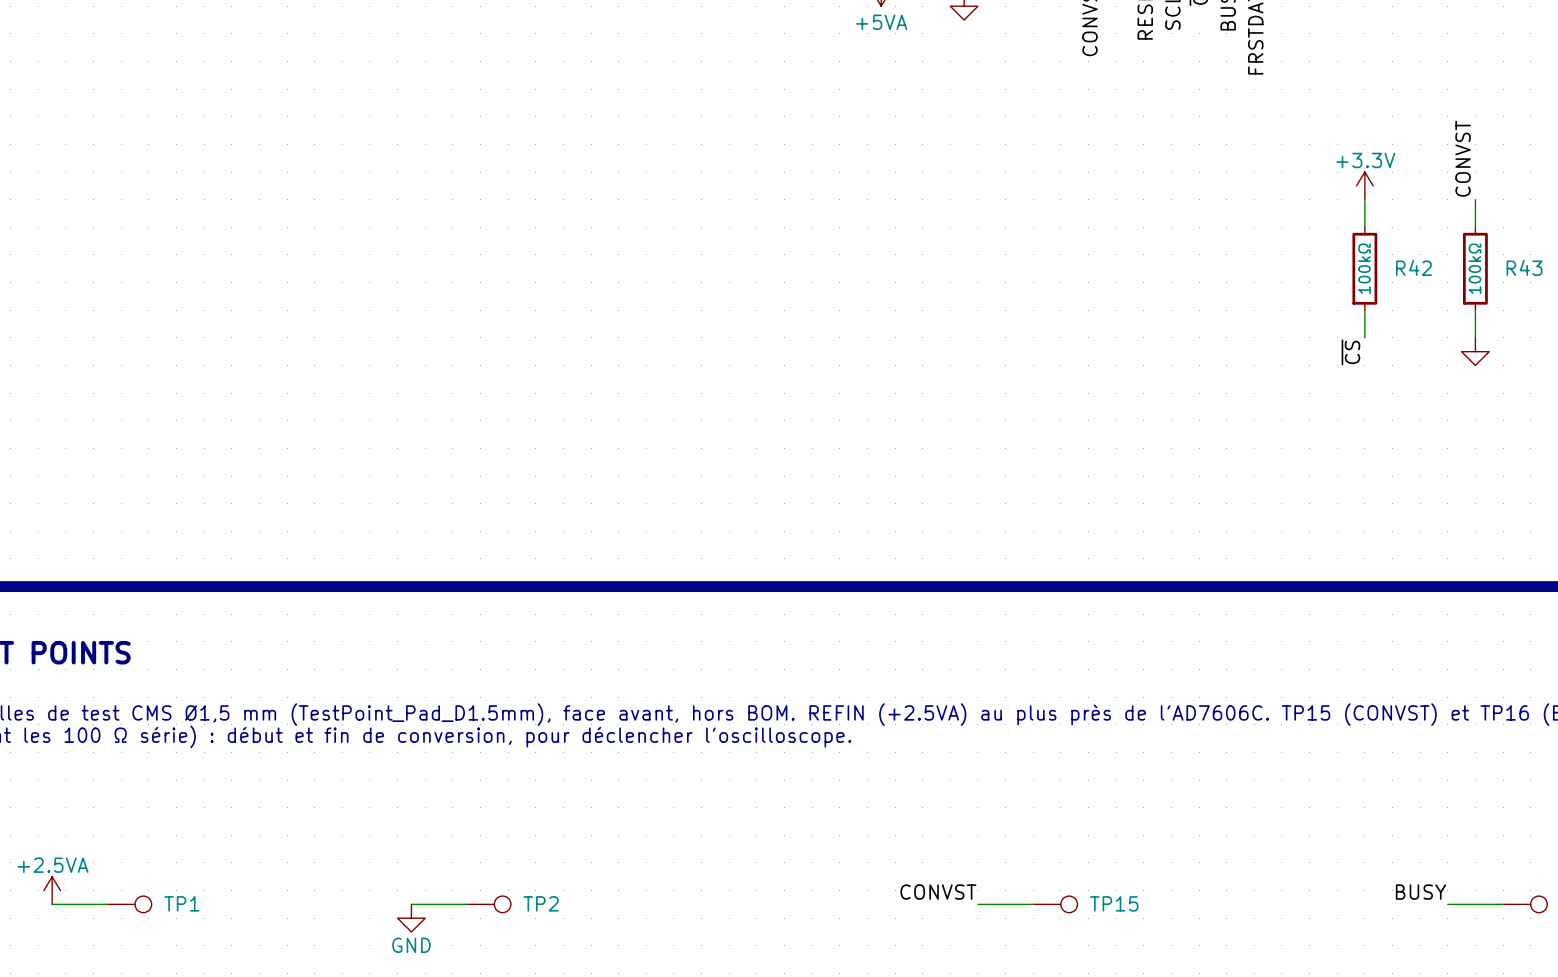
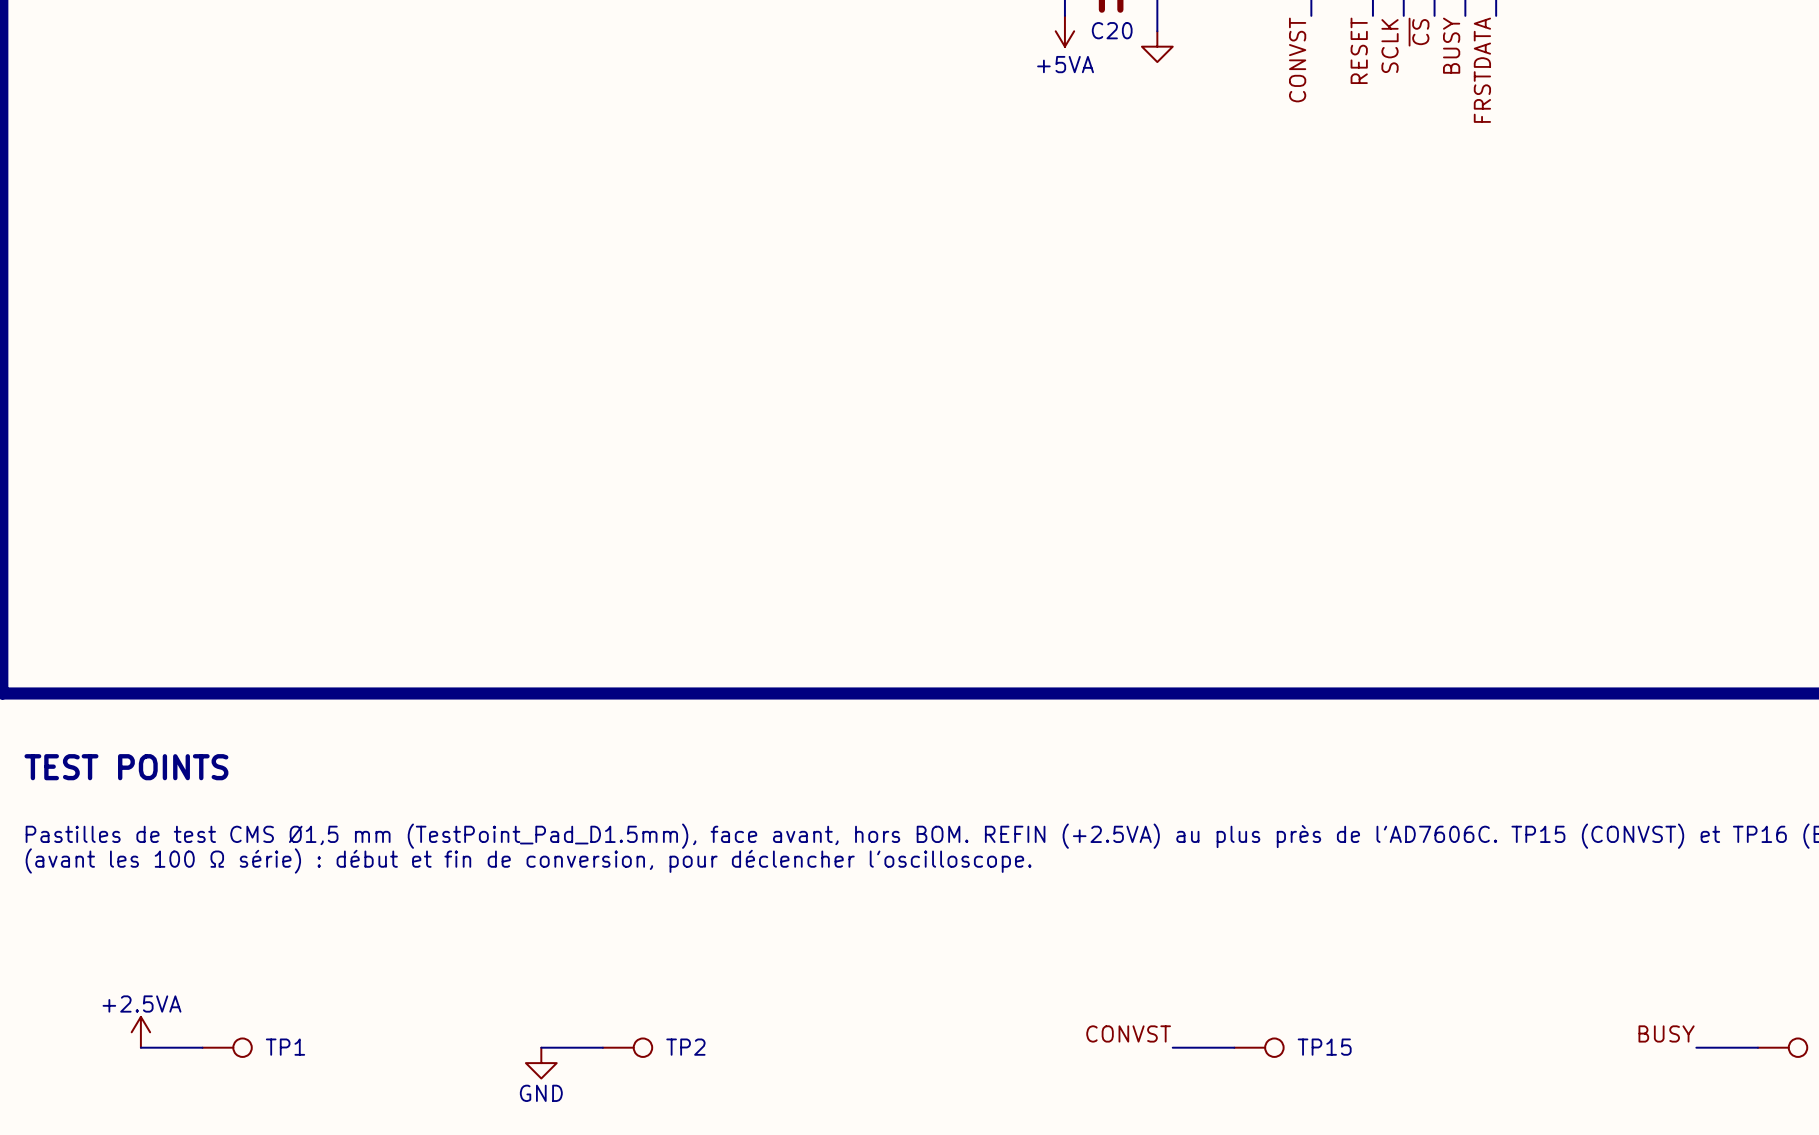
label: CONVST (1463, 158) -> none
power symbol: +3.3V (1364, 185) -> none
wire: (1364, 199) (1364, 227) -> none
wire: (1475, 199) (1475, 227) -> none
R42: 100kΩ (1364, 268) -> none
R43: 100kΩ (1475, 268) -> none
wire: (1364, 310) (1364, 337) -> none
wire: (1475, 310) (1475, 337) -> none
power symbol: (1475, 351) -> none
label: ~{CS} (1350, 352) -> none

